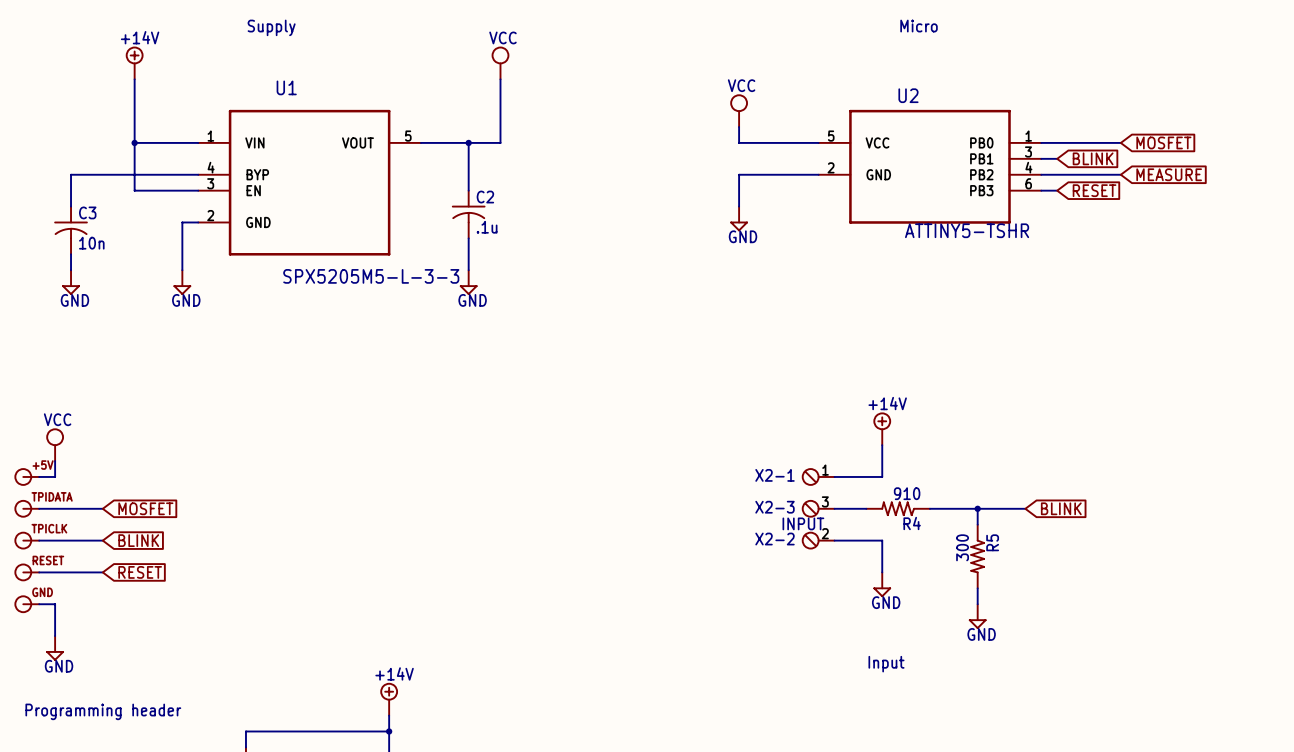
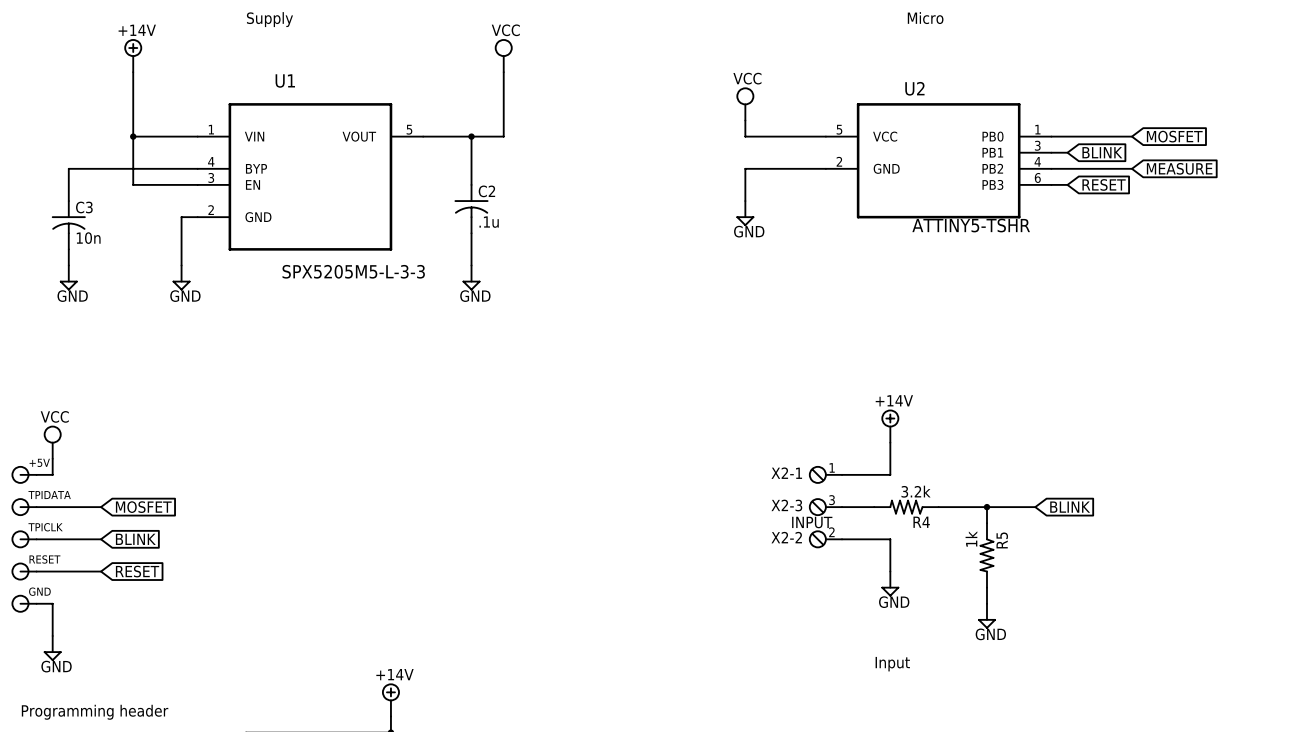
R4 value: 910 (907, 493) -> 3.2k (916, 491)
R5 value: 300 (962, 547) -> 1k (971, 538)

